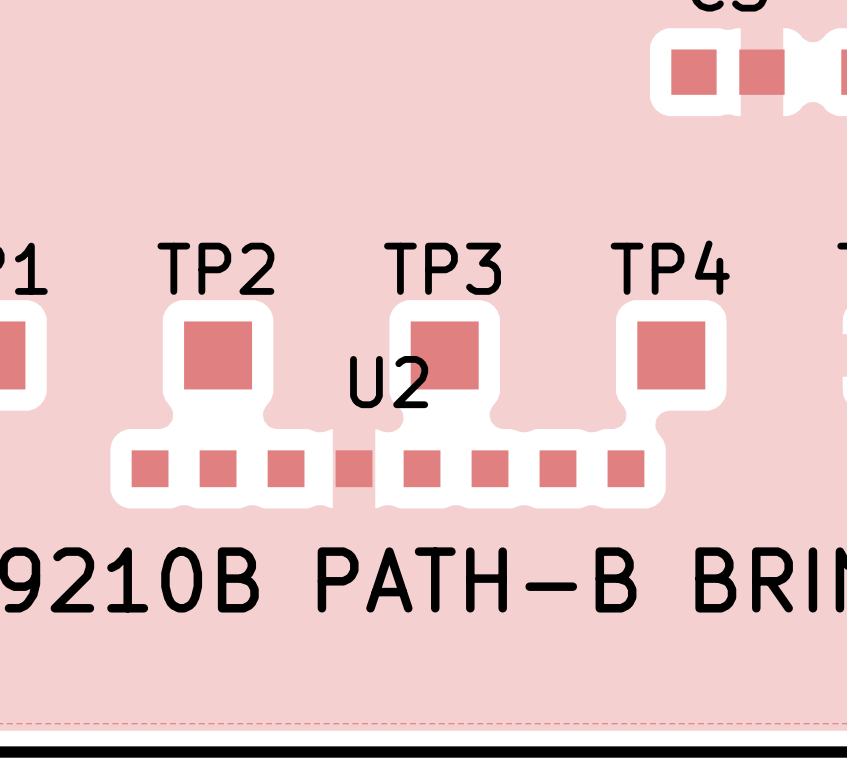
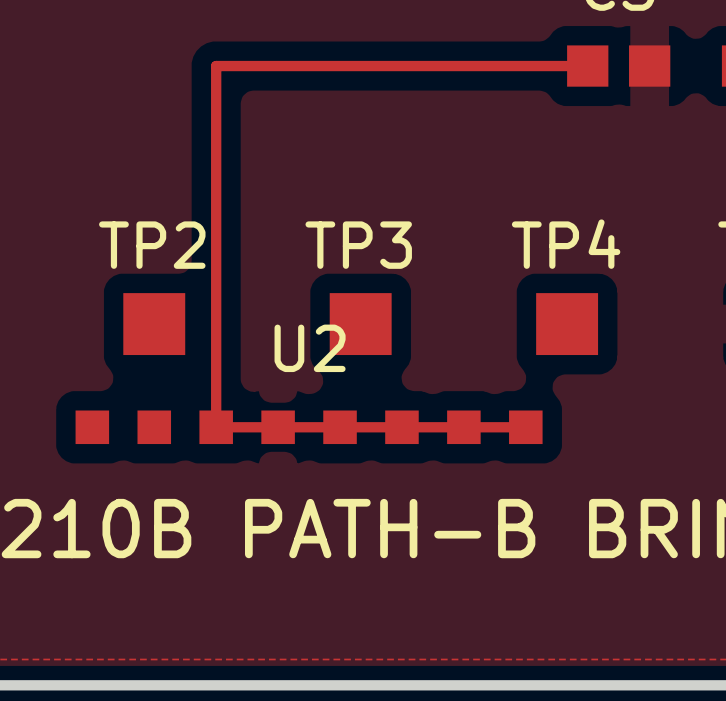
track: none -> (587, 66) (216, 66) (216, 427) (525, 427)

